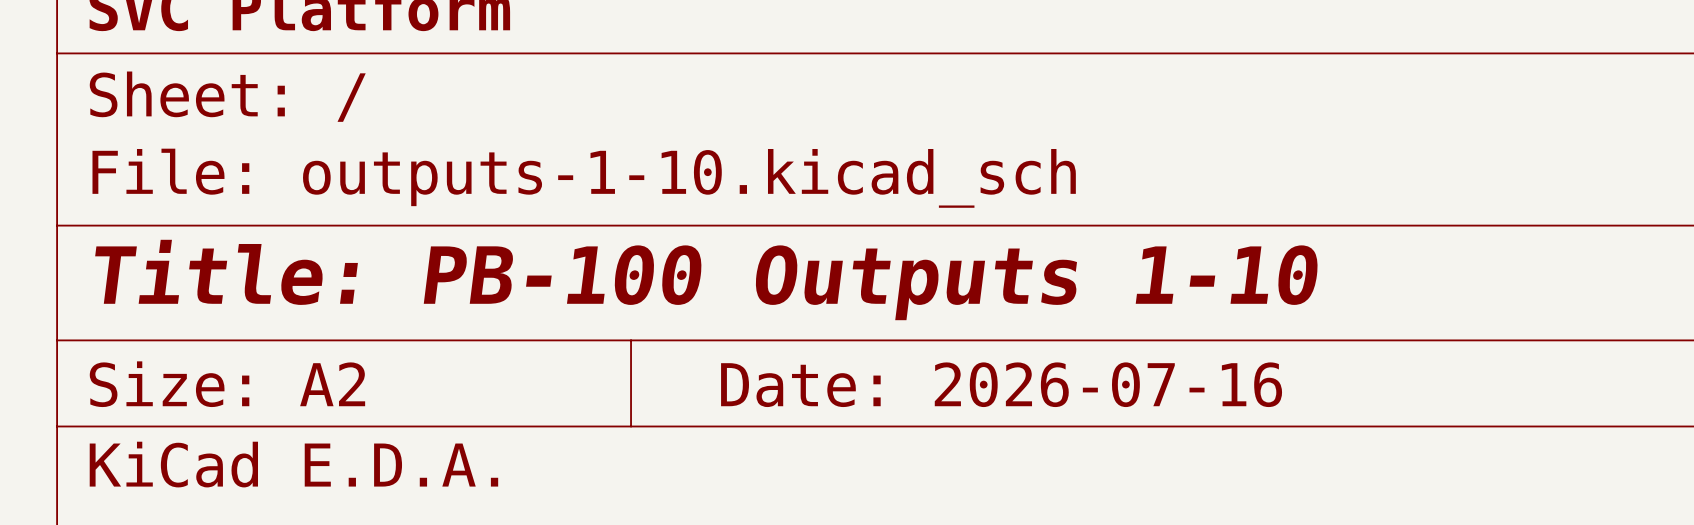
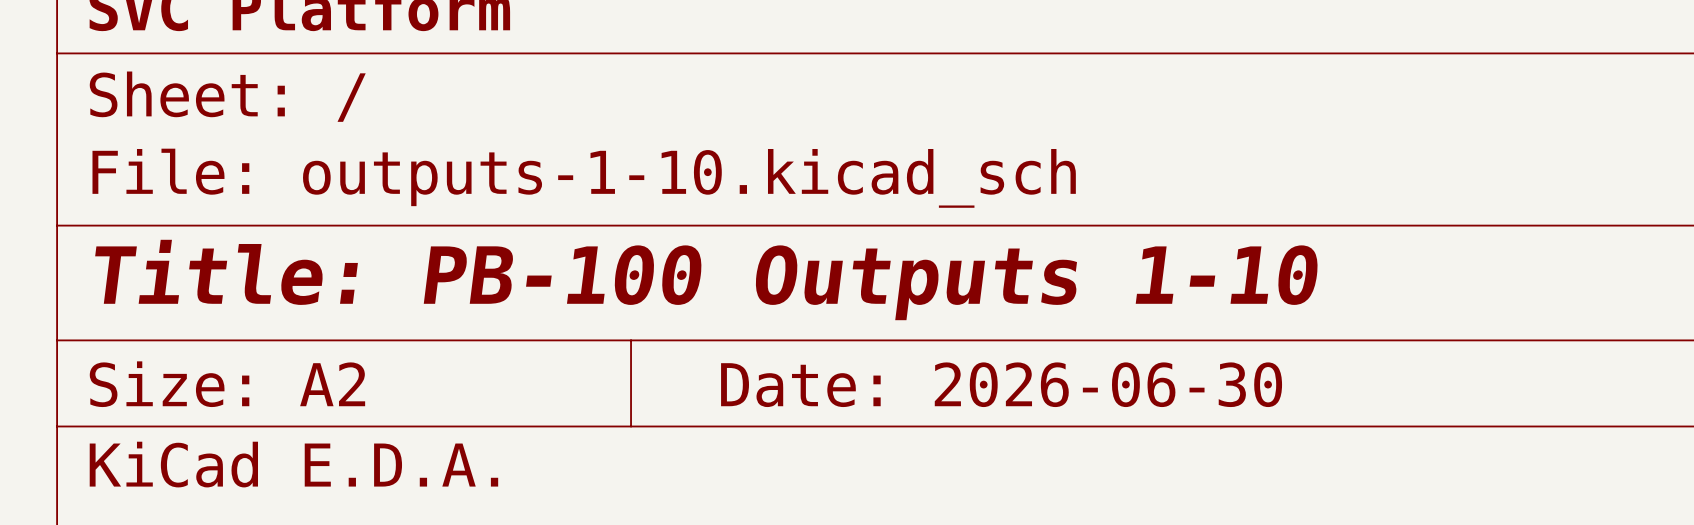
title block: Date: 2026-07-16 (1001, 384) -> Date: 2026-06-30 (1001, 384)

